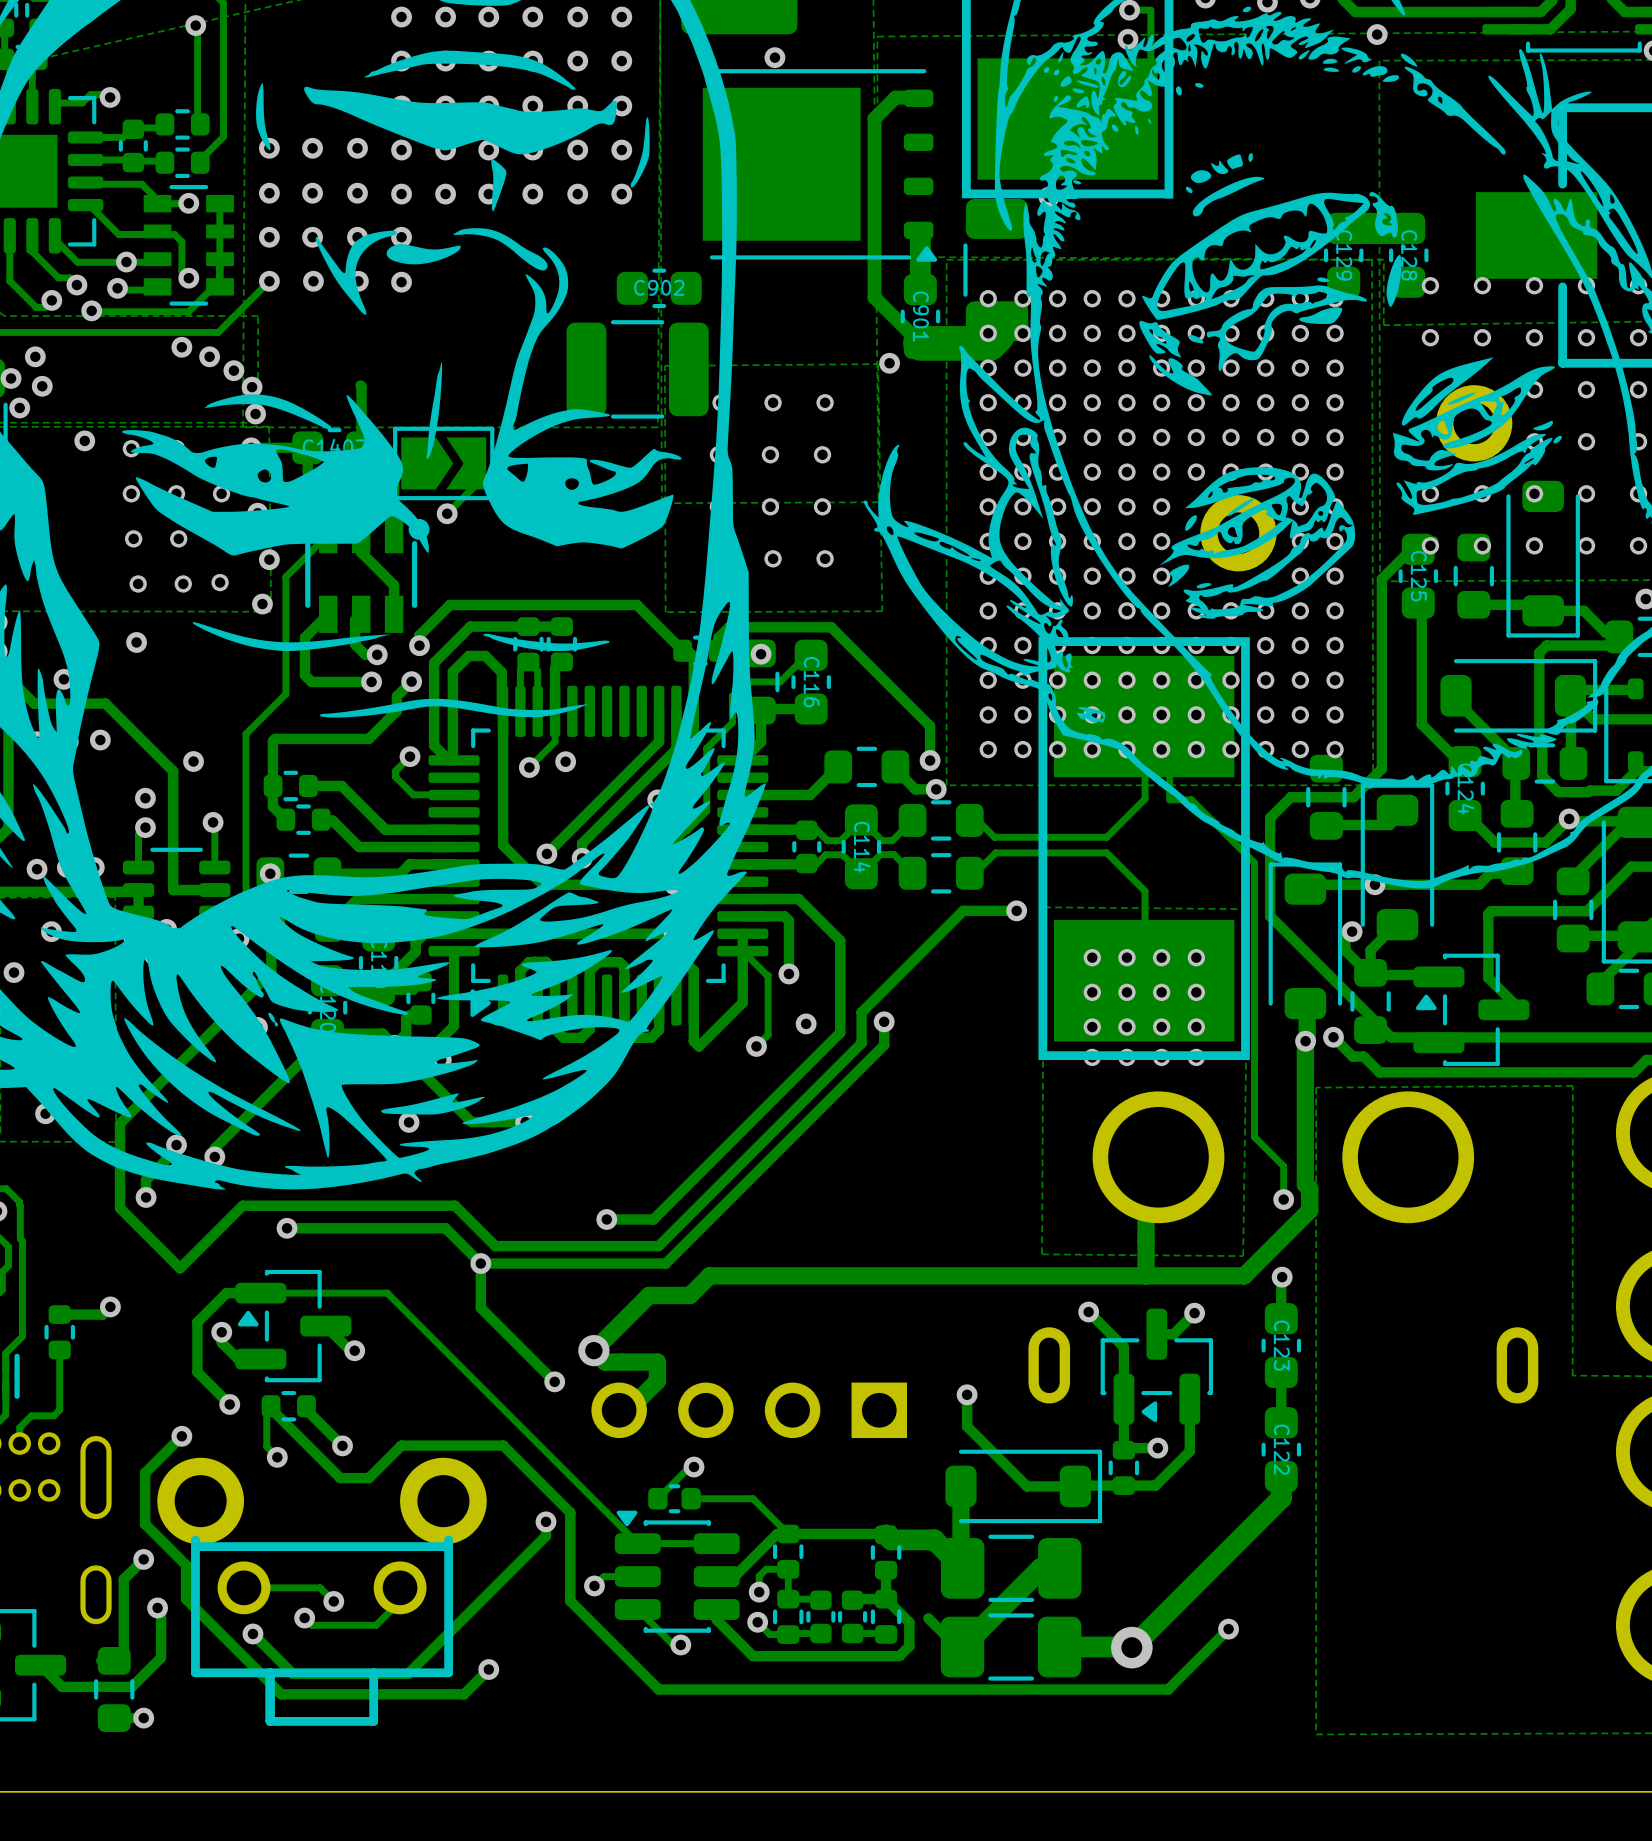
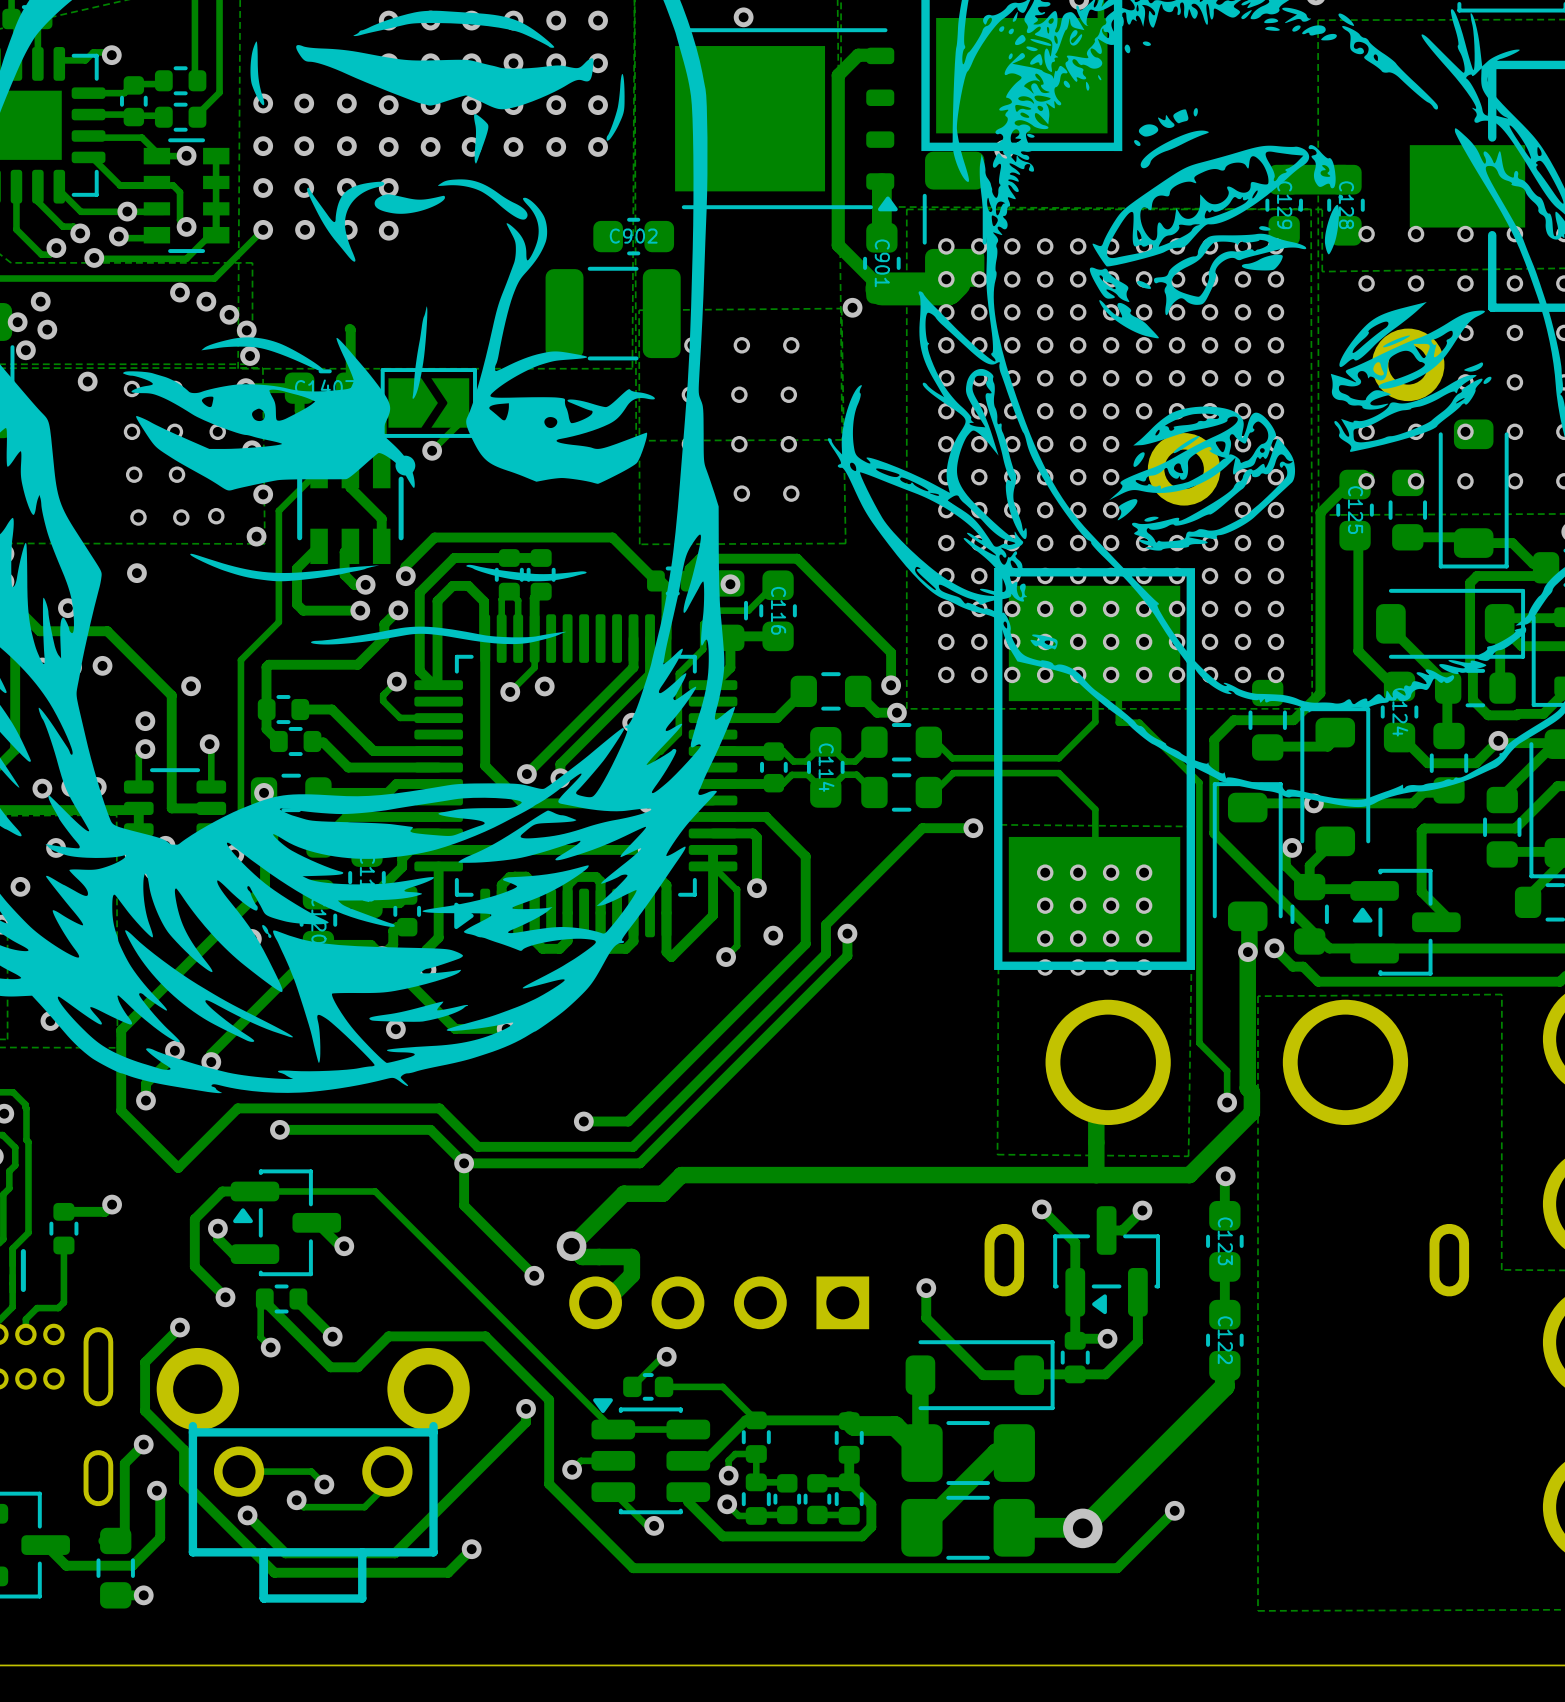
track: (928, 1618) (957, 1647) -> none

